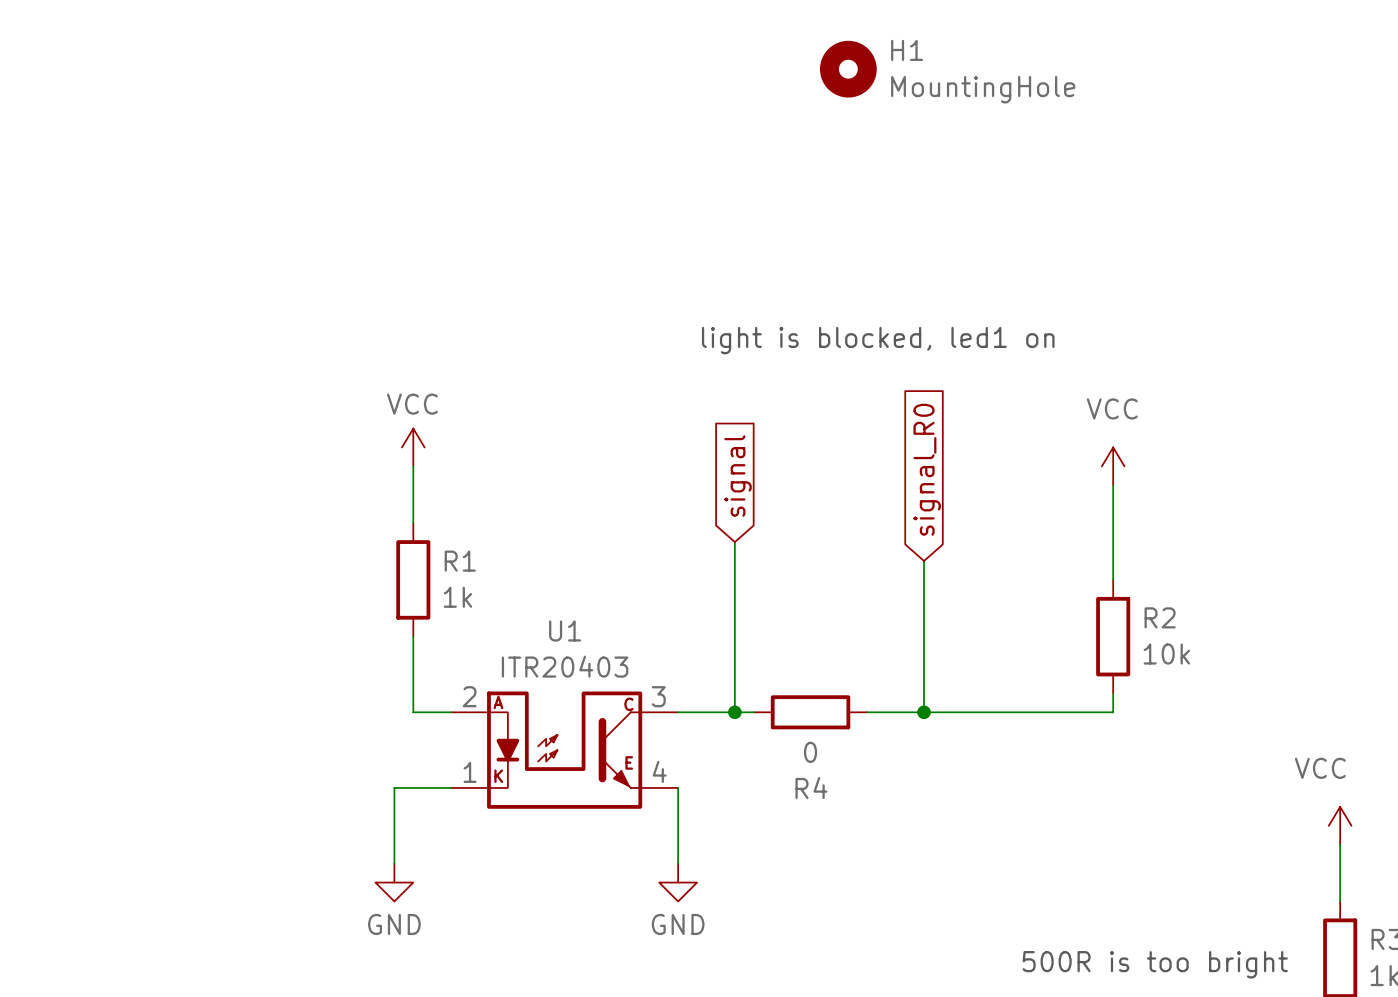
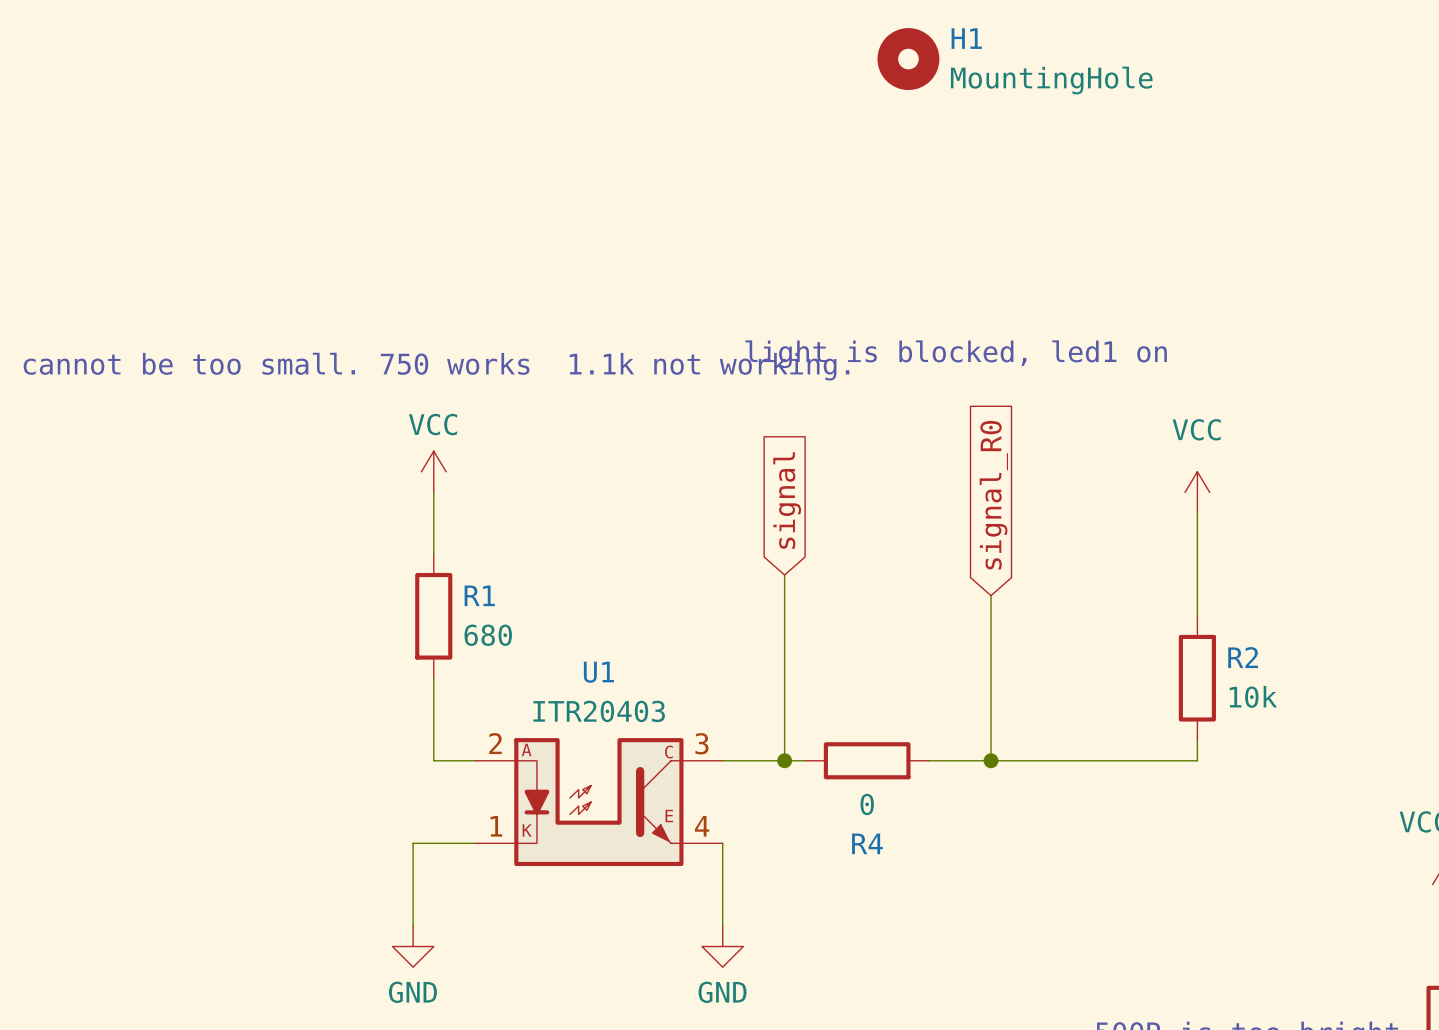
text: none -> cannot be too small. 750 works 1.1k not working. (436, 366)
R1 value: 1k (457, 597) -> 680 (488, 635)

